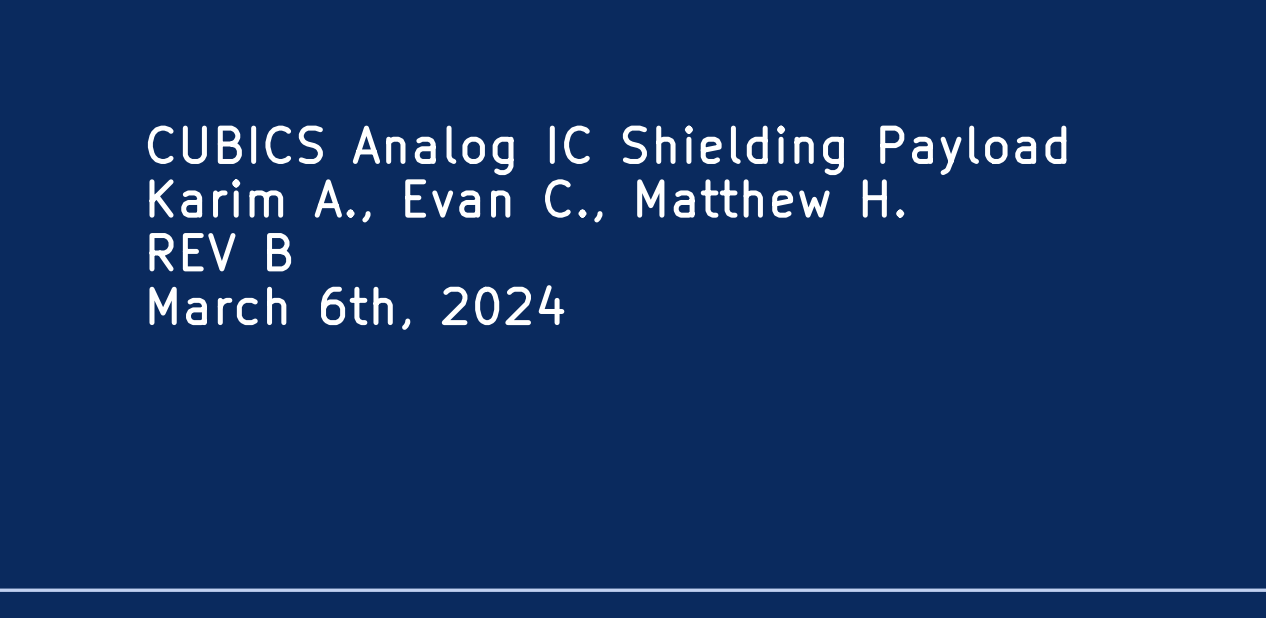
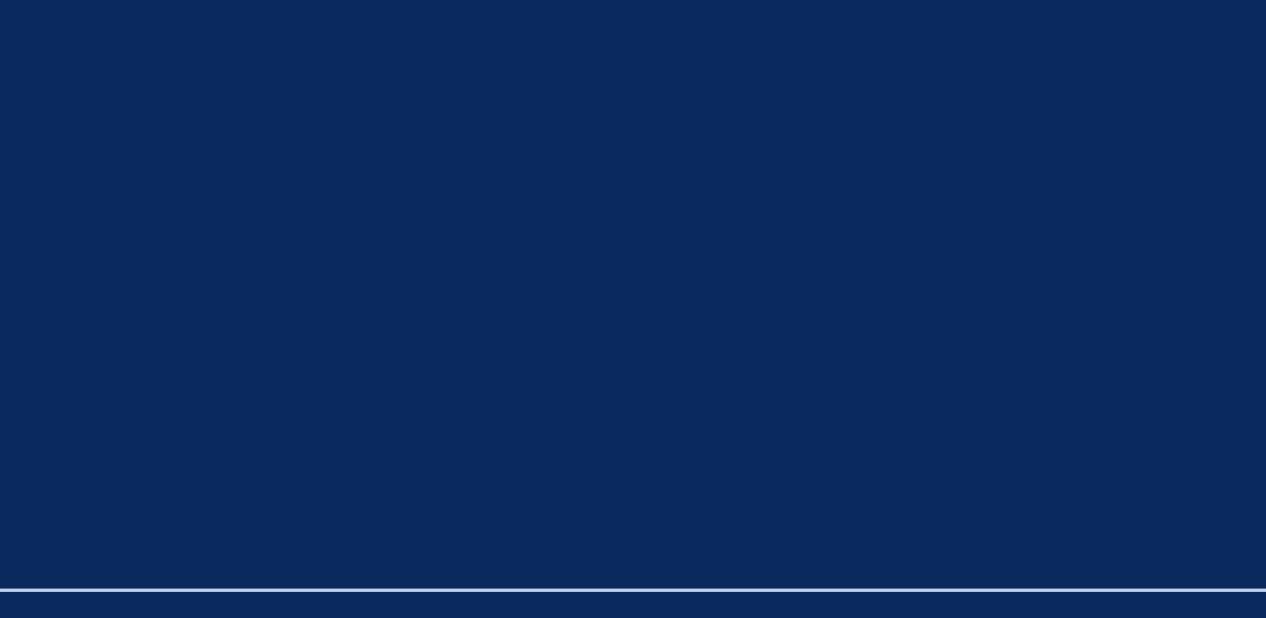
text: CUBICS Analog IC Shielding Payload (607, 150) -> none
text: Karim A., Evan C., Matthew H. (526, 200) -> none
text: REV B (220, 252) -> none
text: March 6th, 2024 (356, 307) -> none

